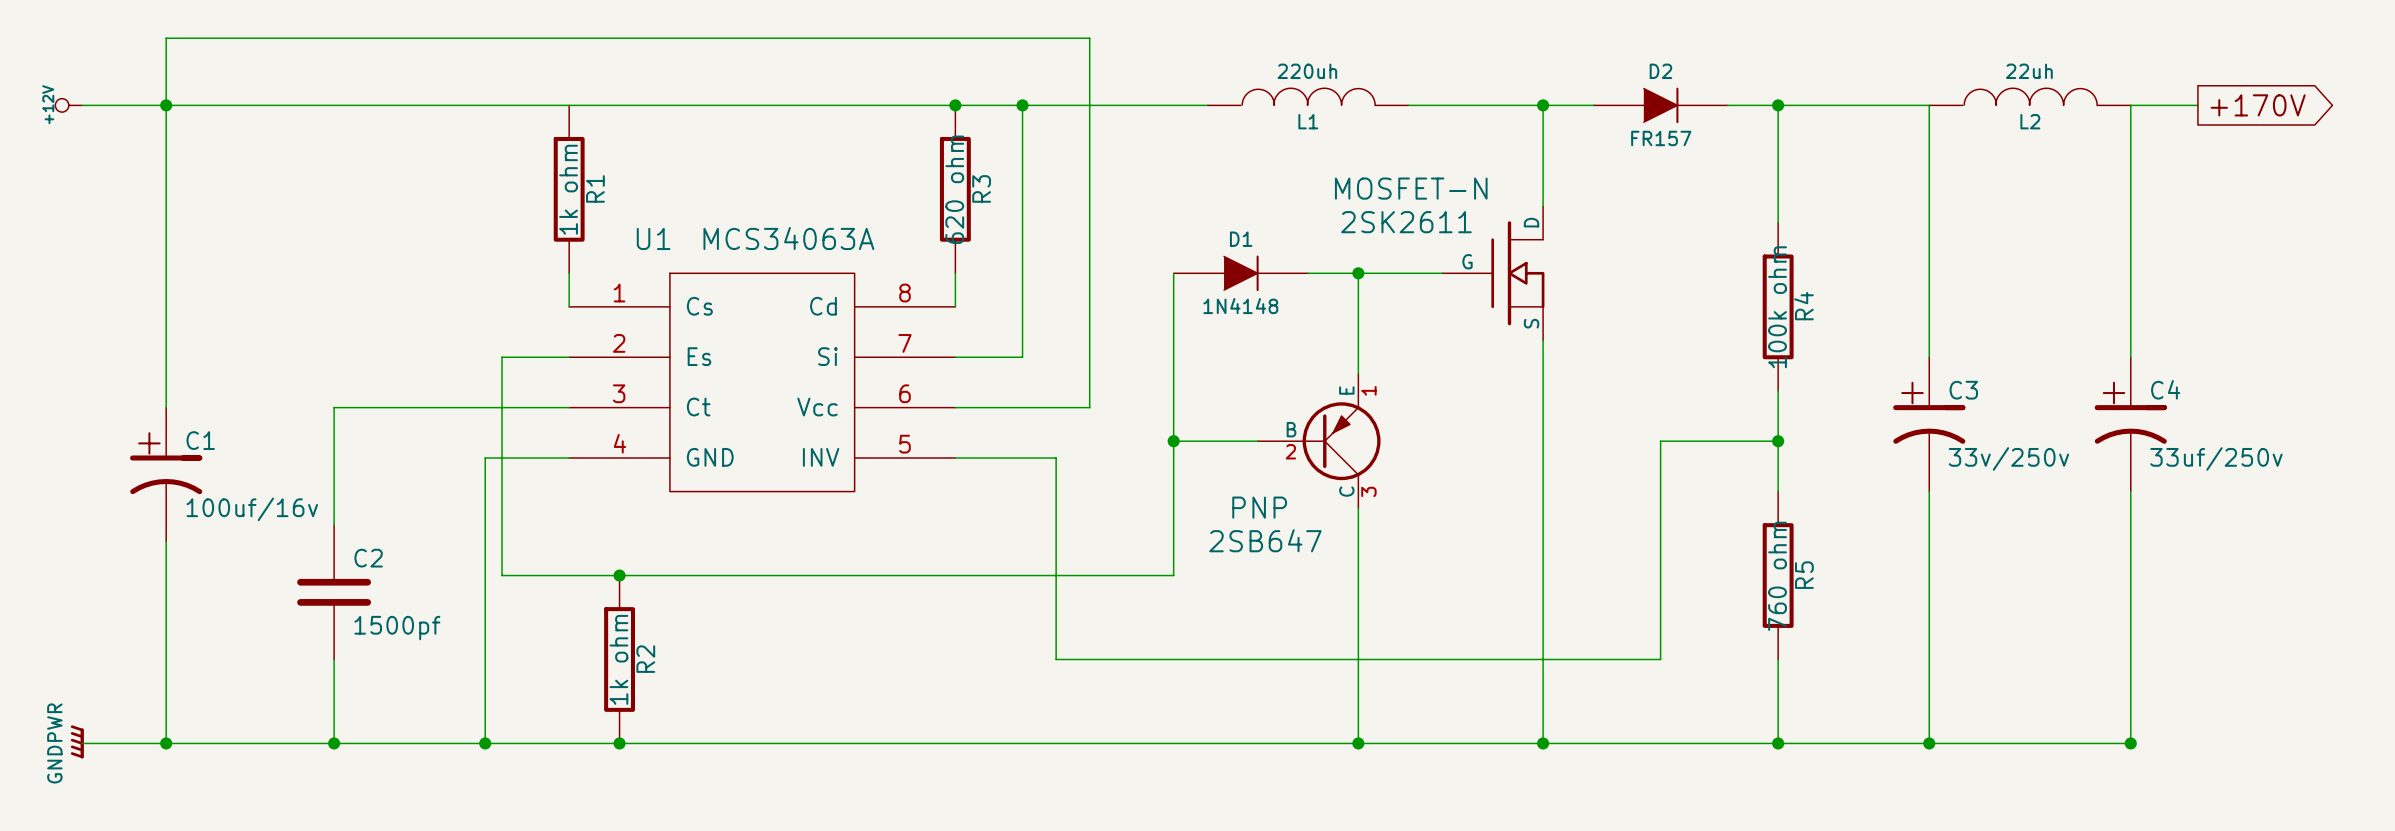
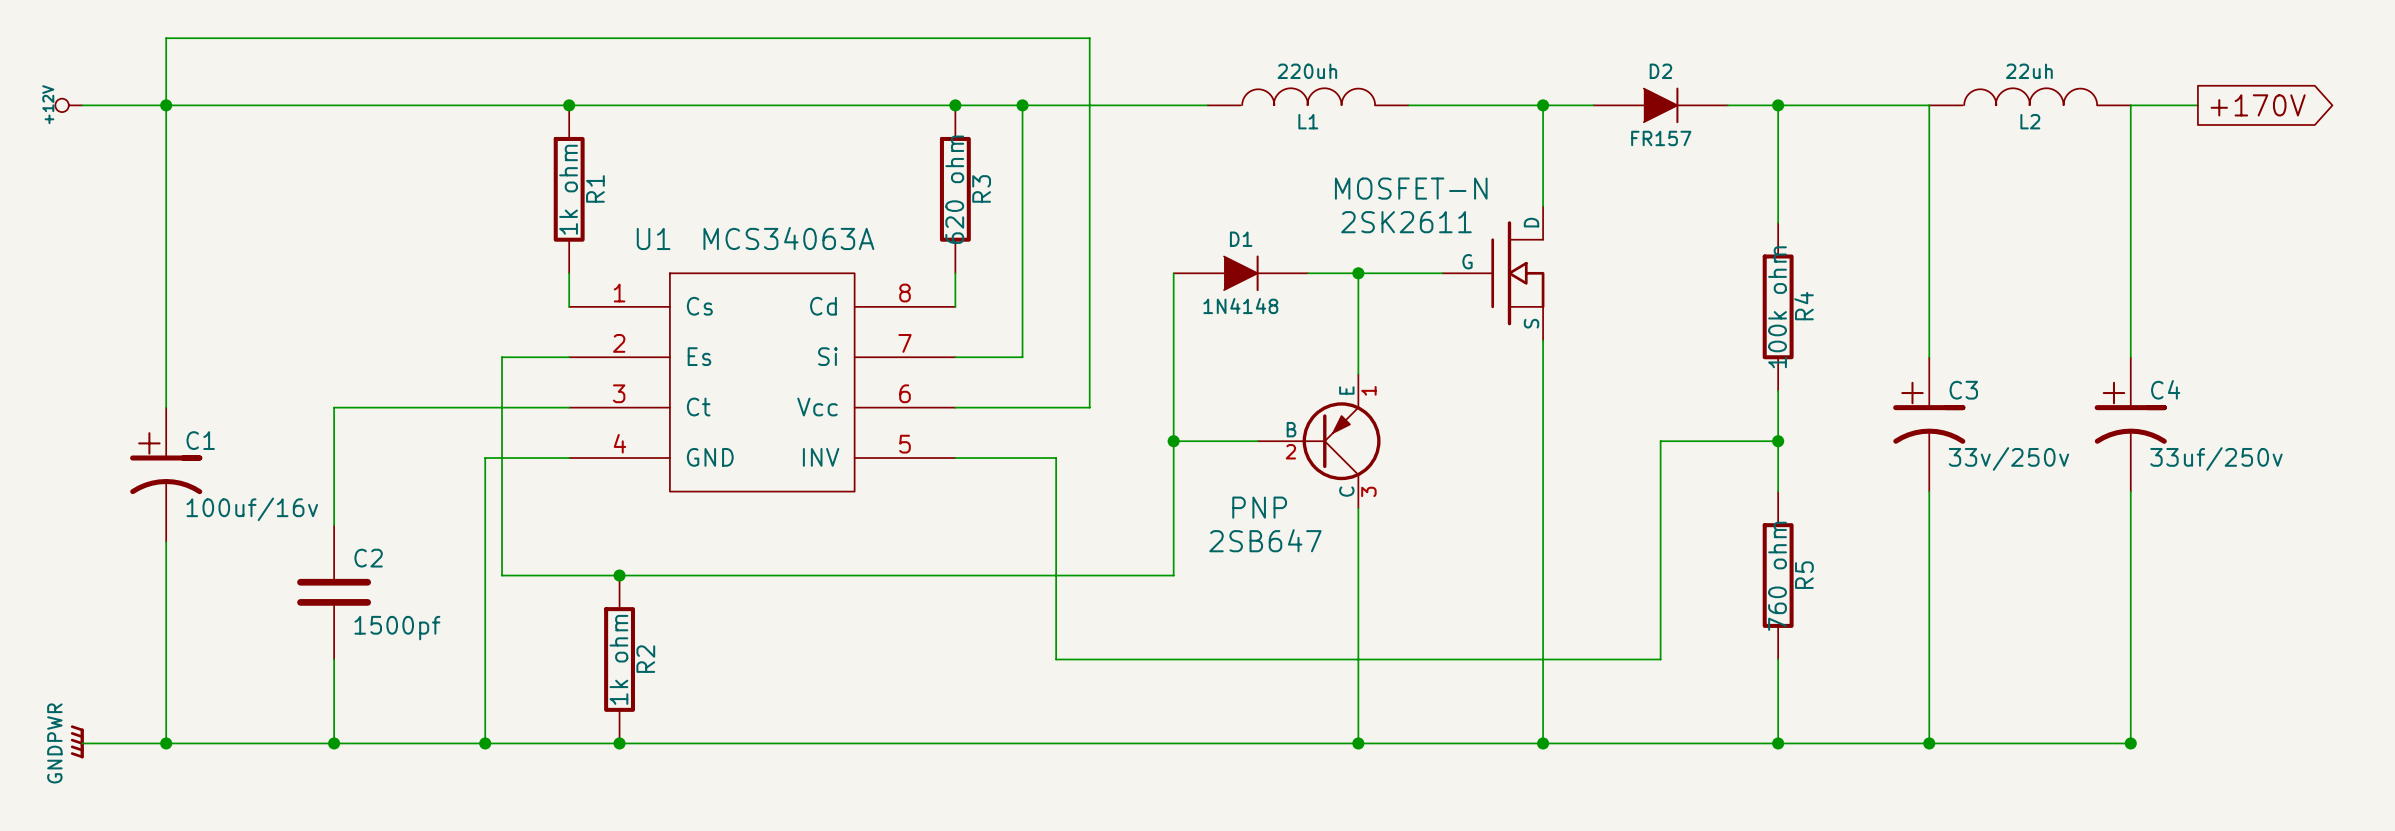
junction: none -> (569, 105)

